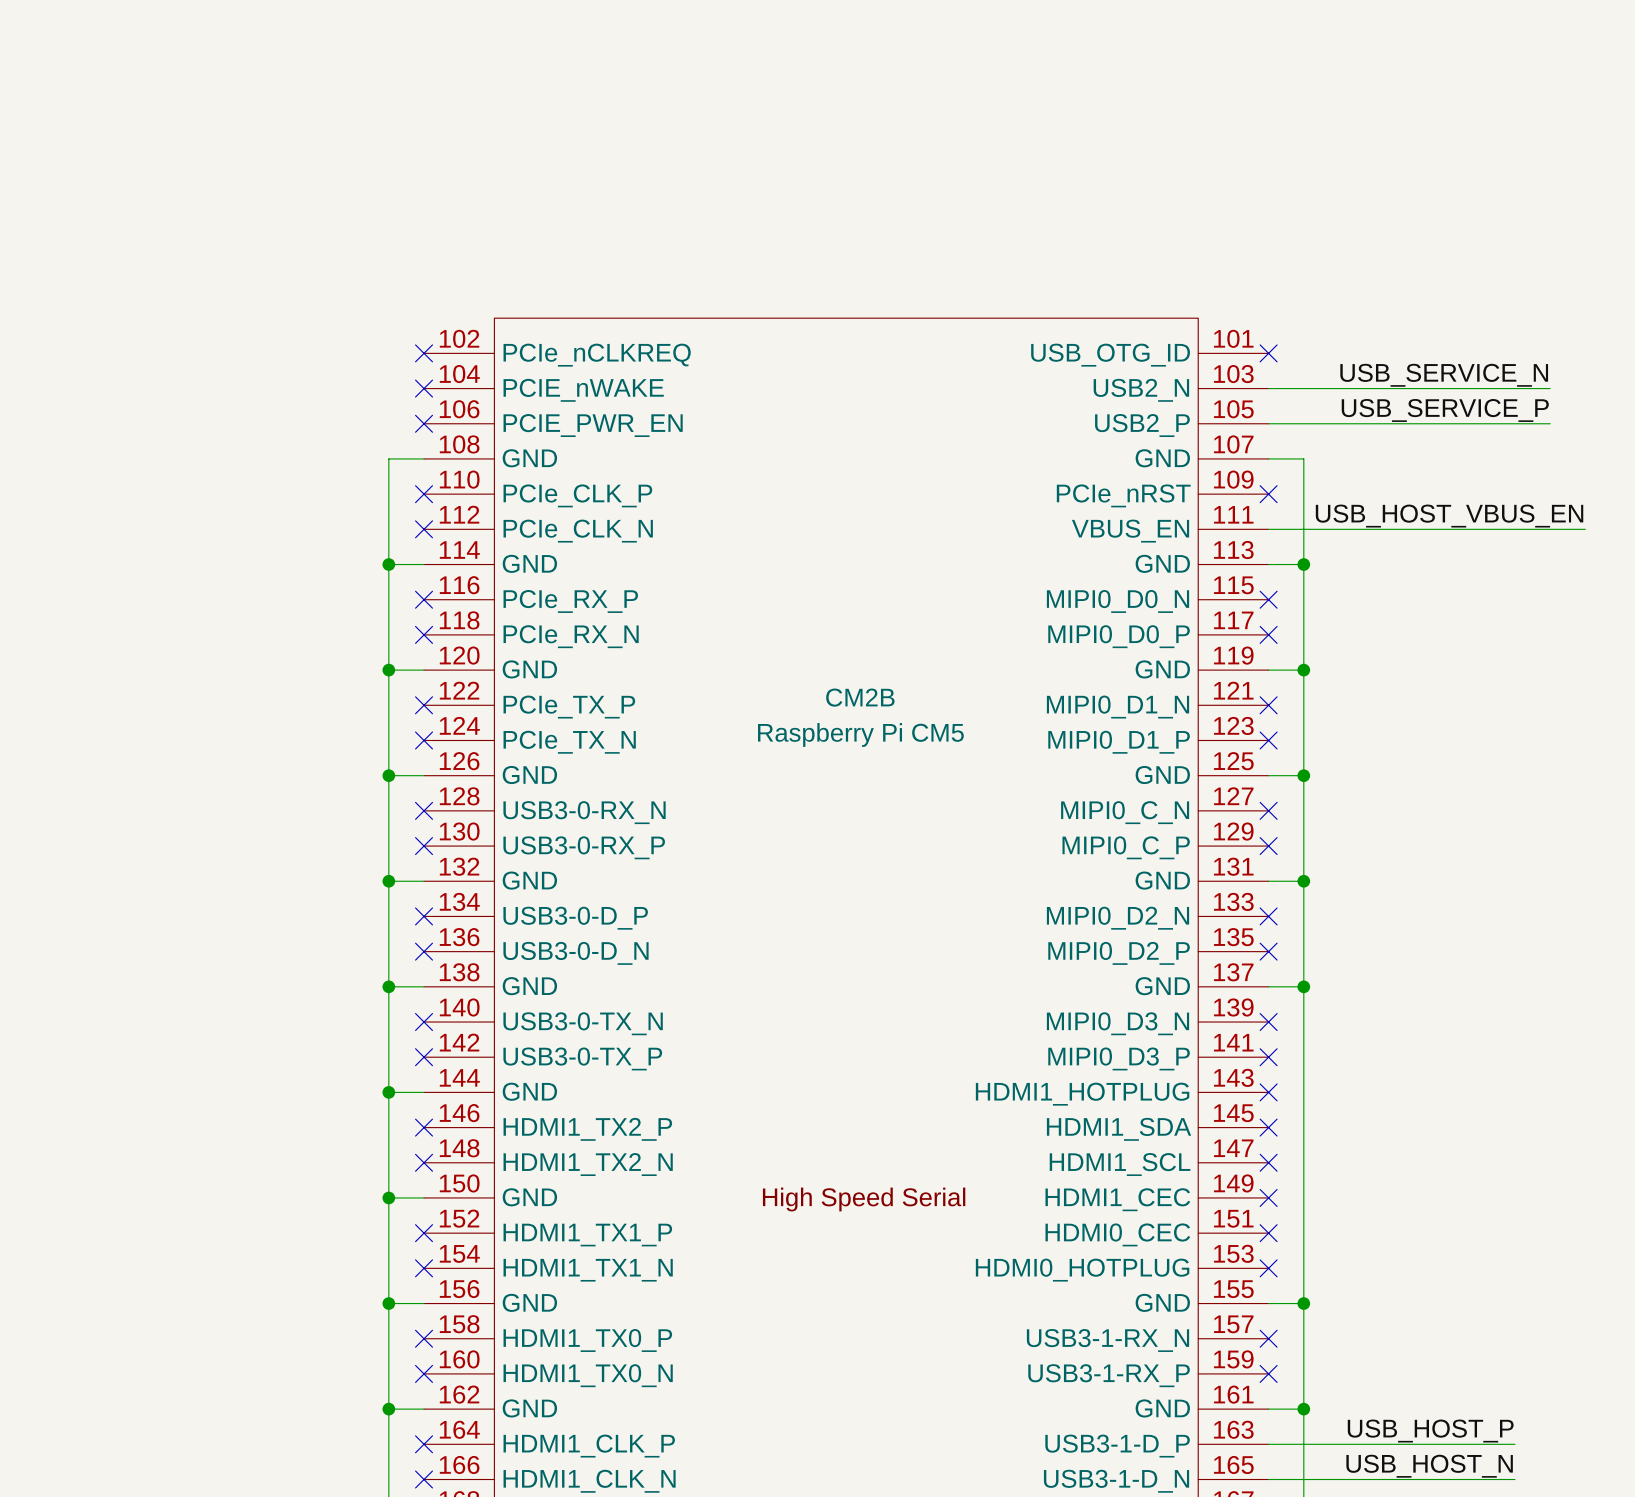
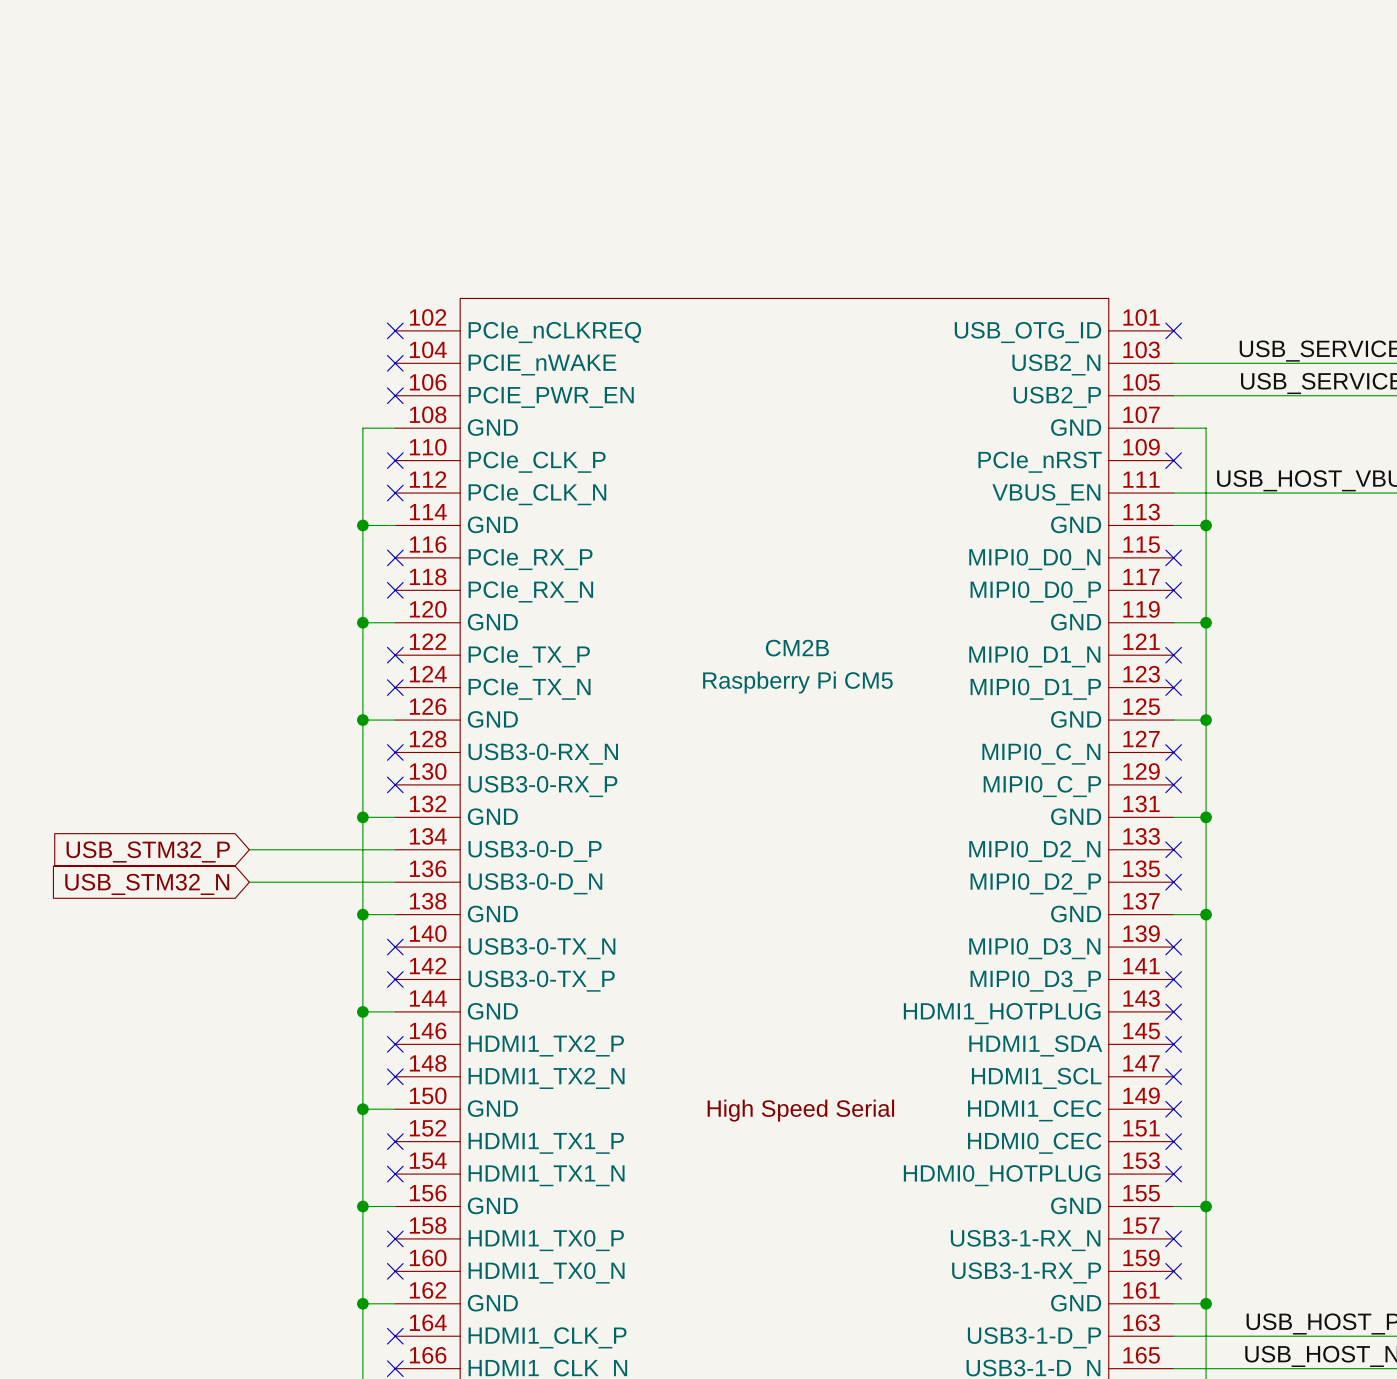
wire: none -> (249, 849) (395, 849)
no-connect mark: (424, 916) -> none
global label: none -> USB_STM32_P (148, 851)
wire: none -> (249, 882) (395, 882)
no-connect mark: (424, 951) -> none
global label: none -> USB_STM32_N (147, 884)

